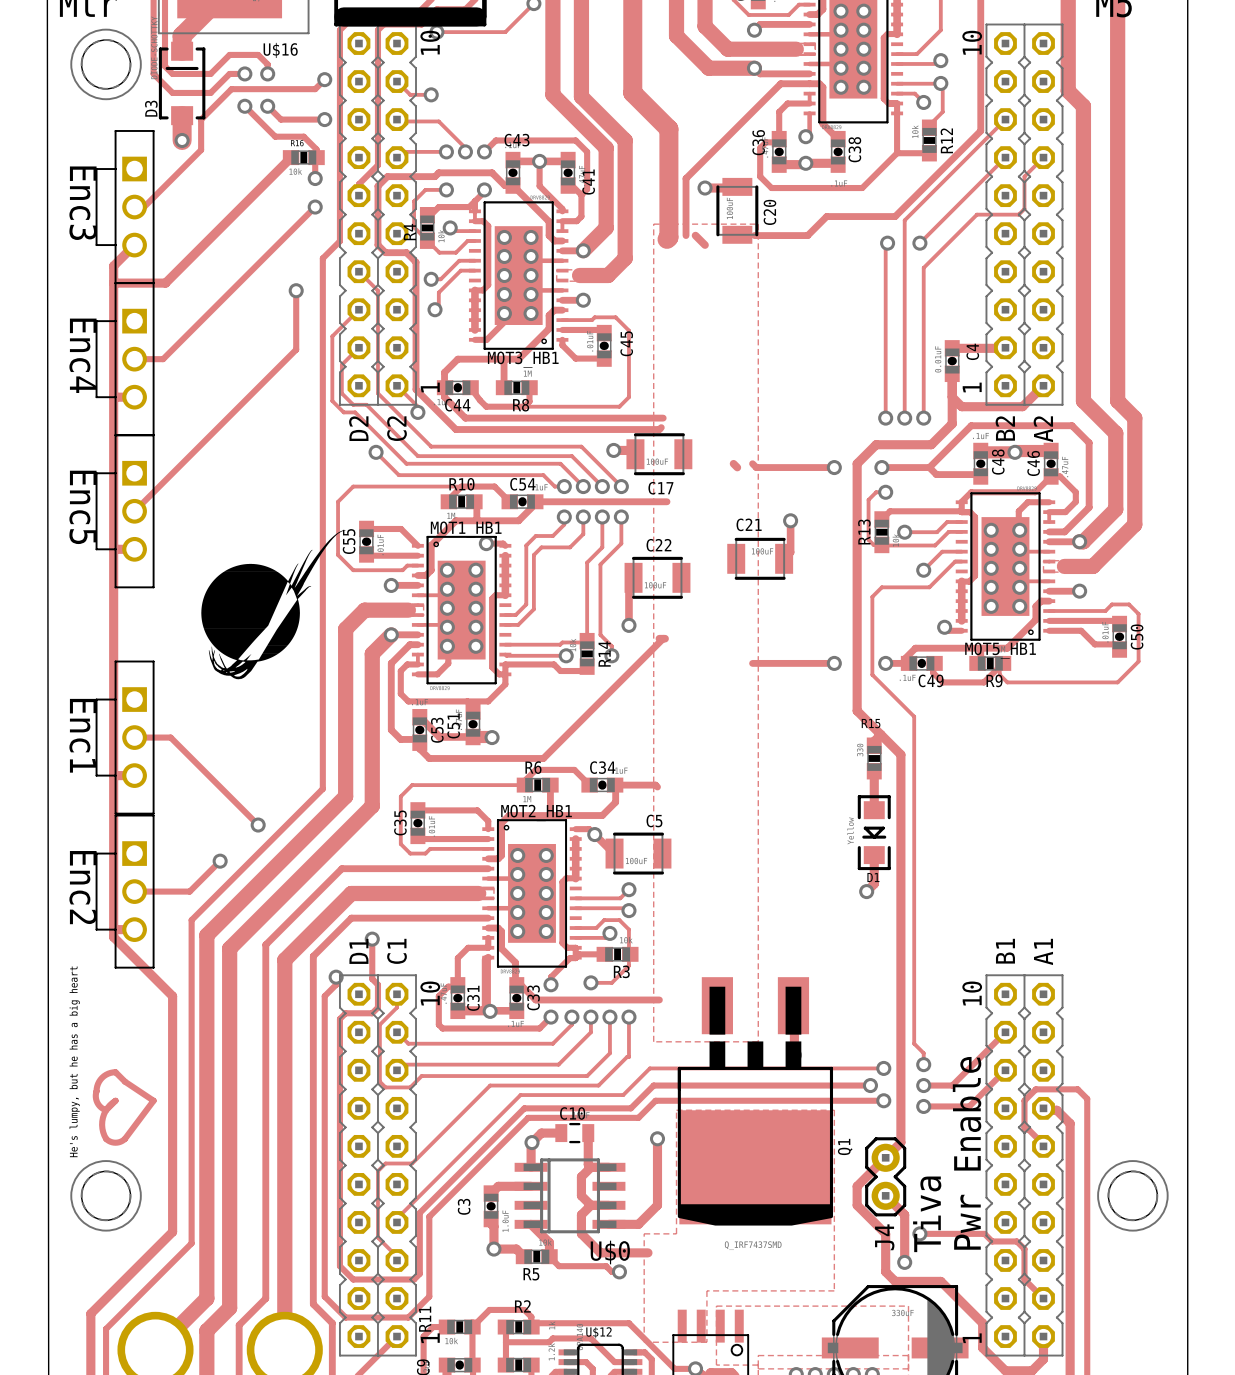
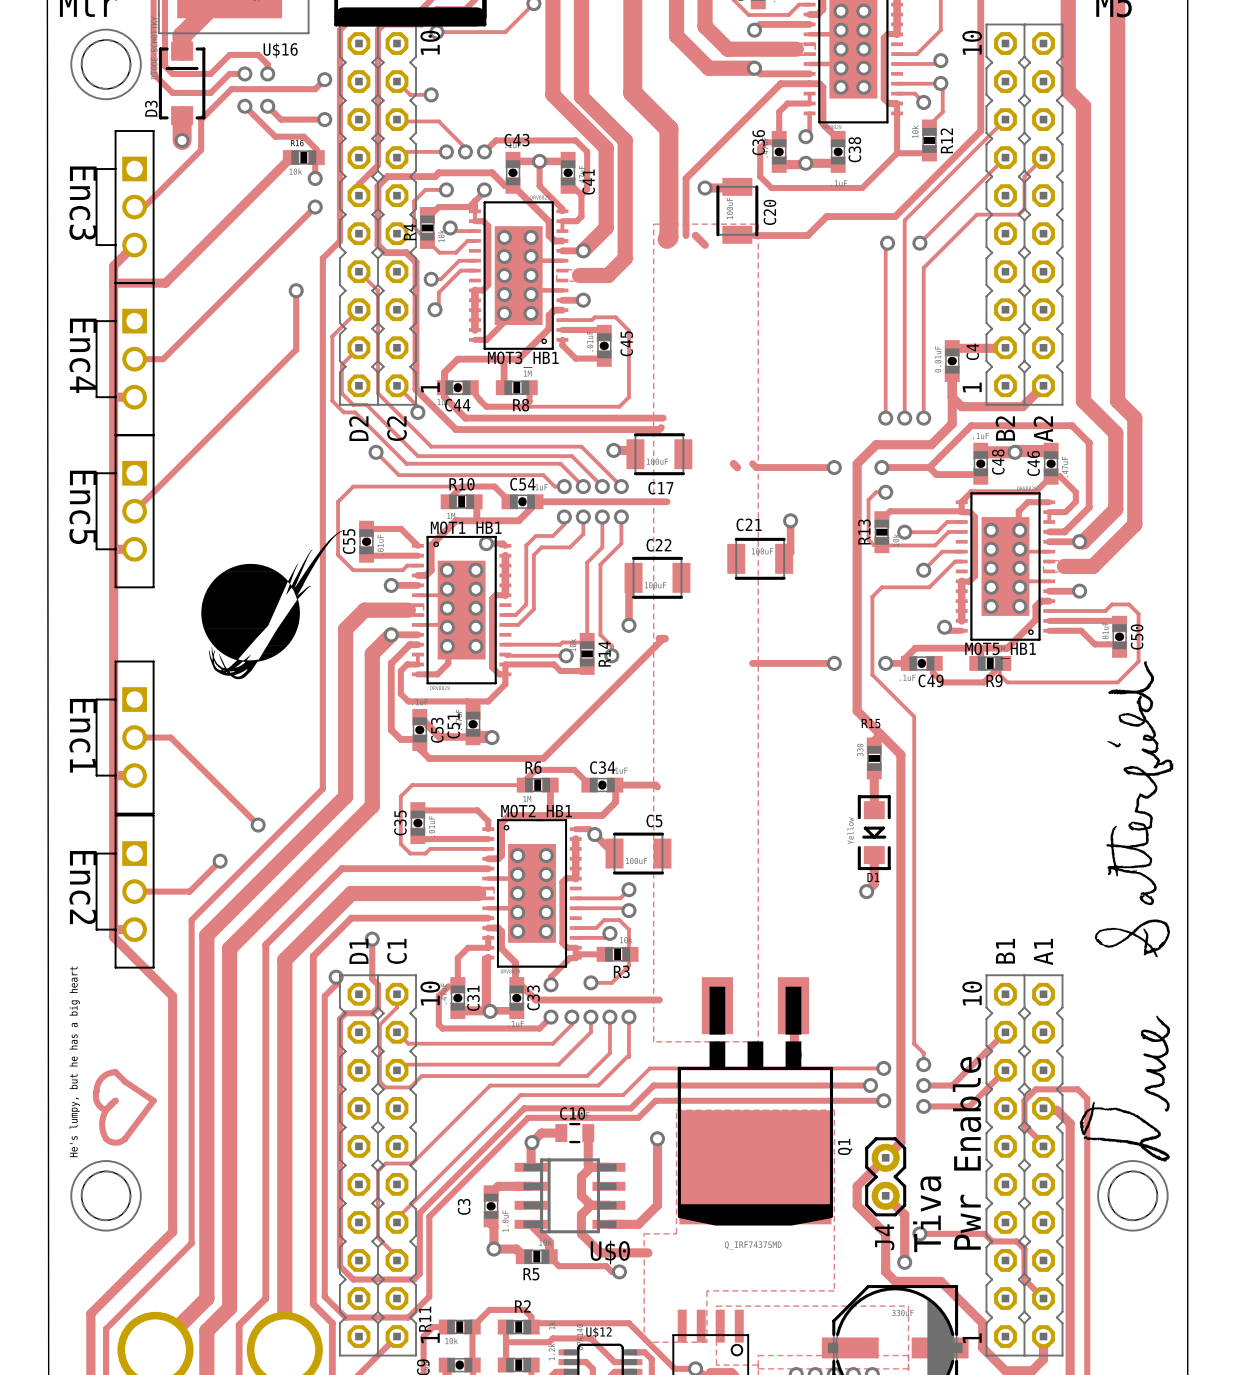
drawing: none -> [1094, 661, 1174, 958]
drawing: none -> [1107, 741, 1122, 748]
drawing: none -> [1140, 1015, 1170, 1112]
drawing: none -> [1079, 1101, 1170, 1162]

